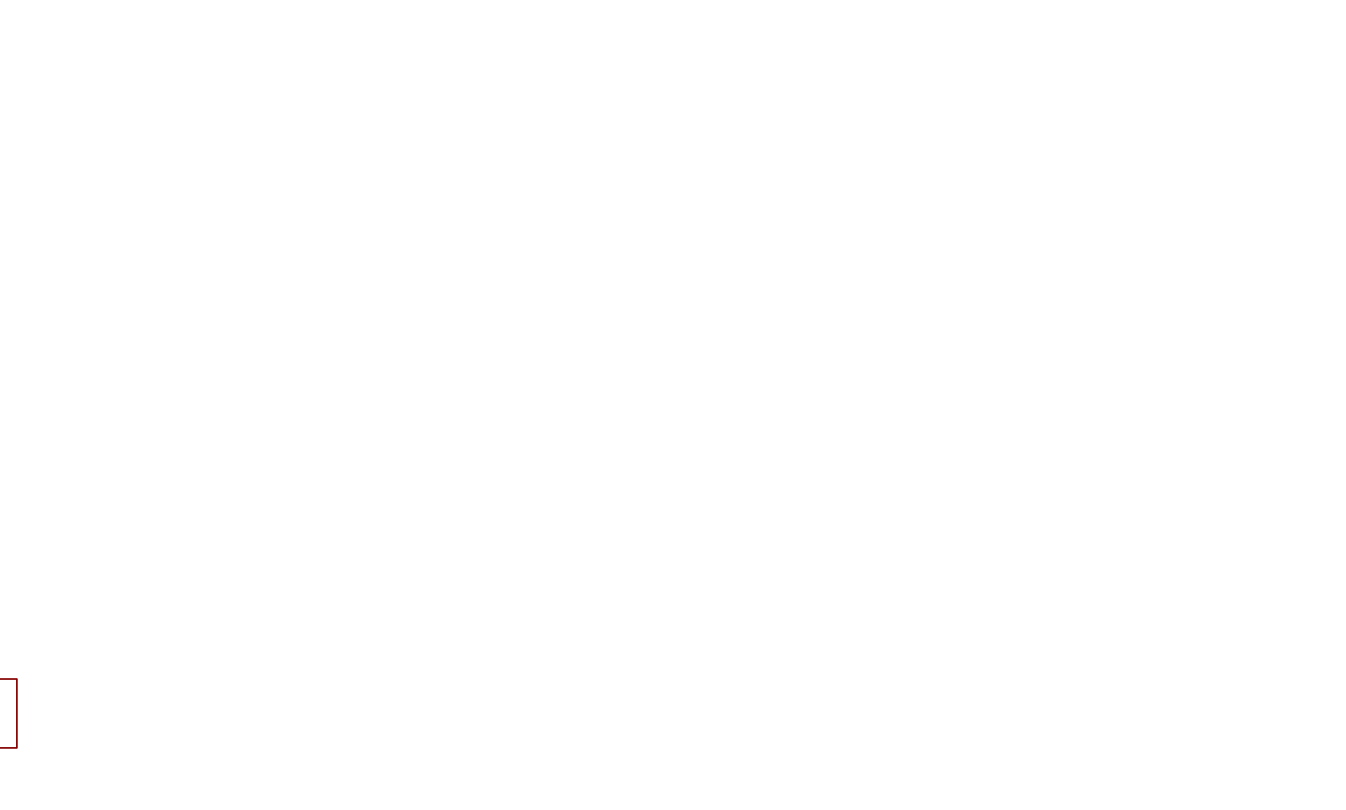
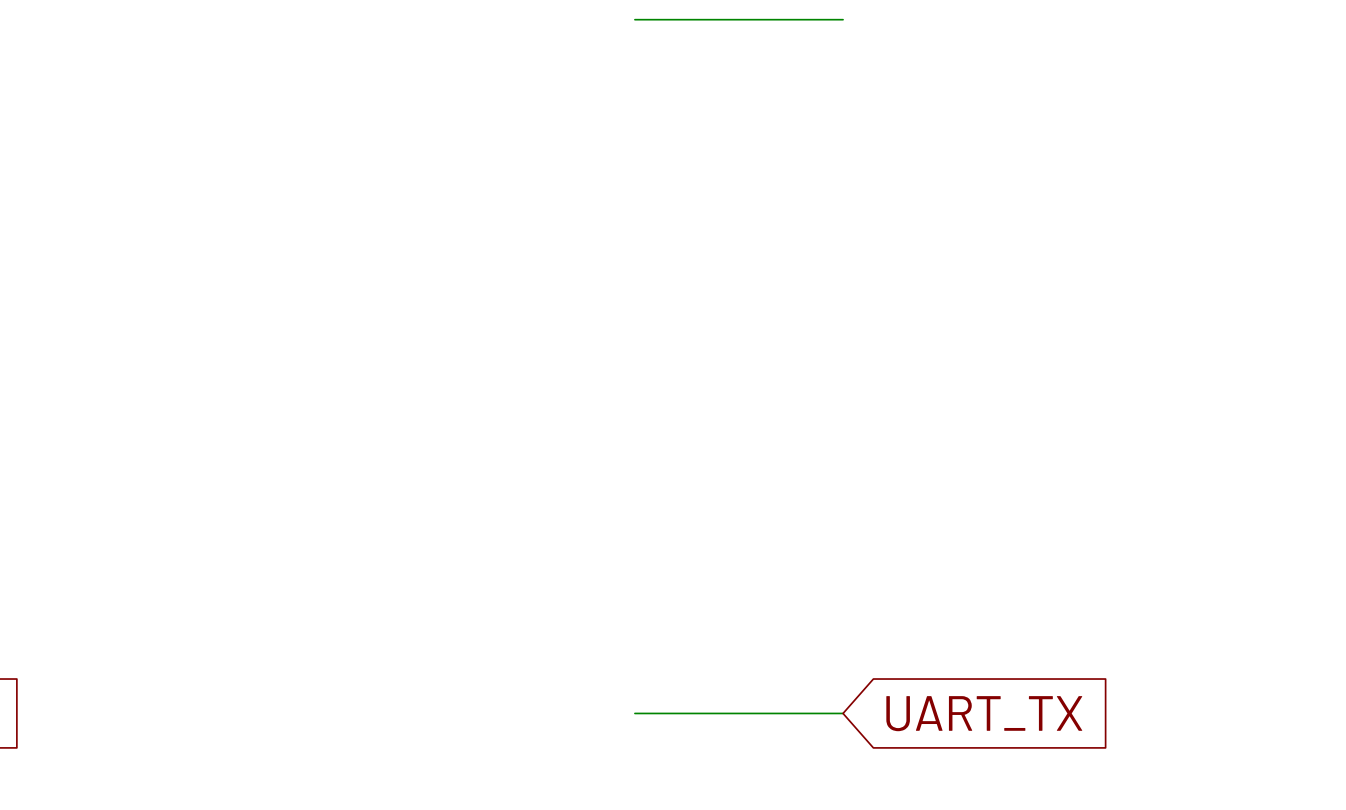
wire: none -> (634, 19) (843, 19)
wire: none -> (634, 713) (843, 713)
global label: none -> UART_TX (984, 713)

